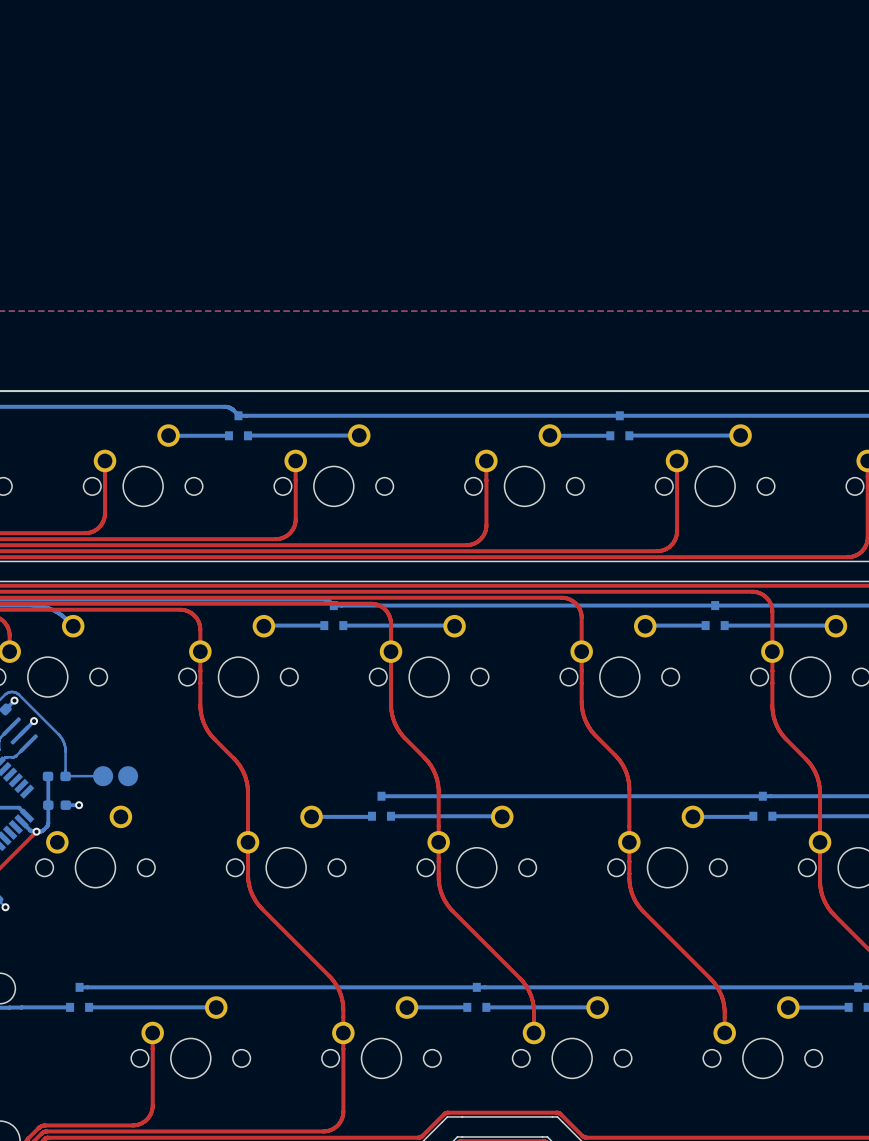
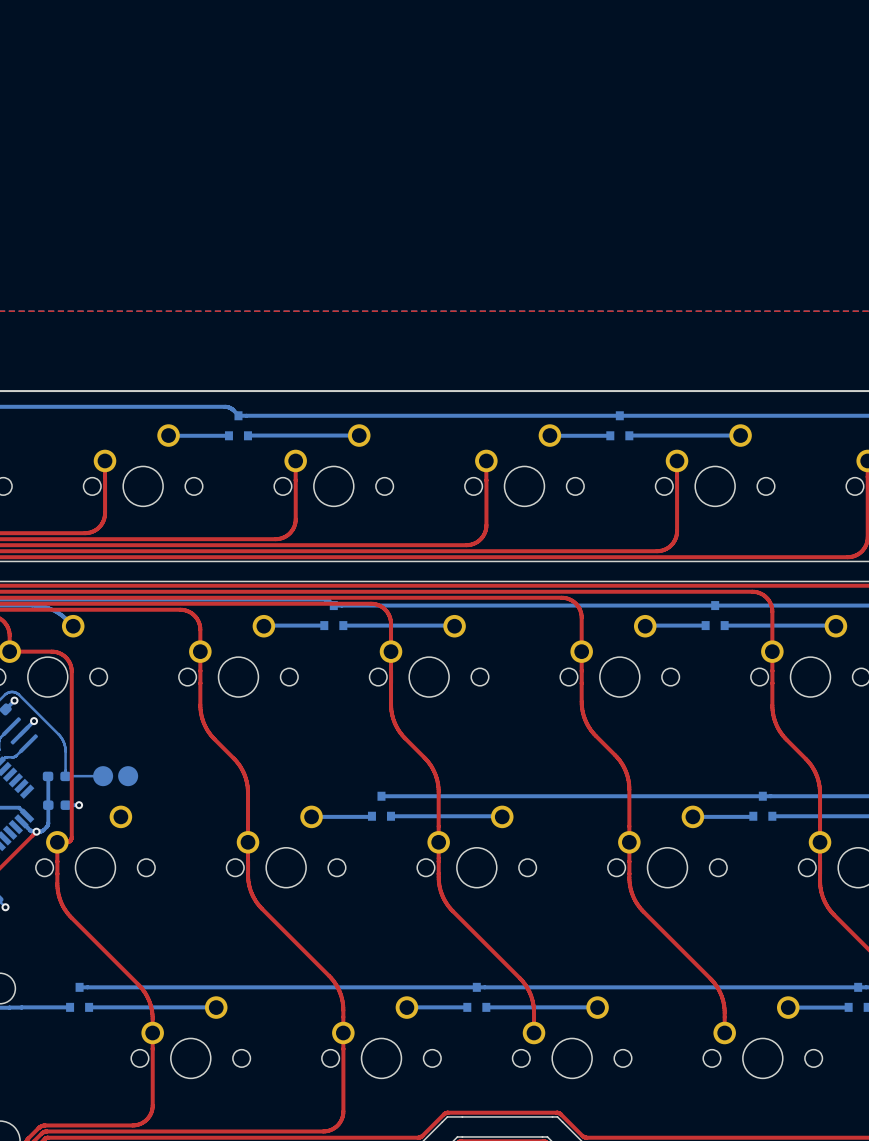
top track: none -> (9, 651) (57, 652) (65, 657) (71, 667) (71, 837) (68, 842) (57, 842) (57, 861)
top track: none -> (57, 861) (57, 873)
top track: none -> (57, 873) (58, 895) (66, 912) (145, 994) (151, 1009) (152, 1032)

